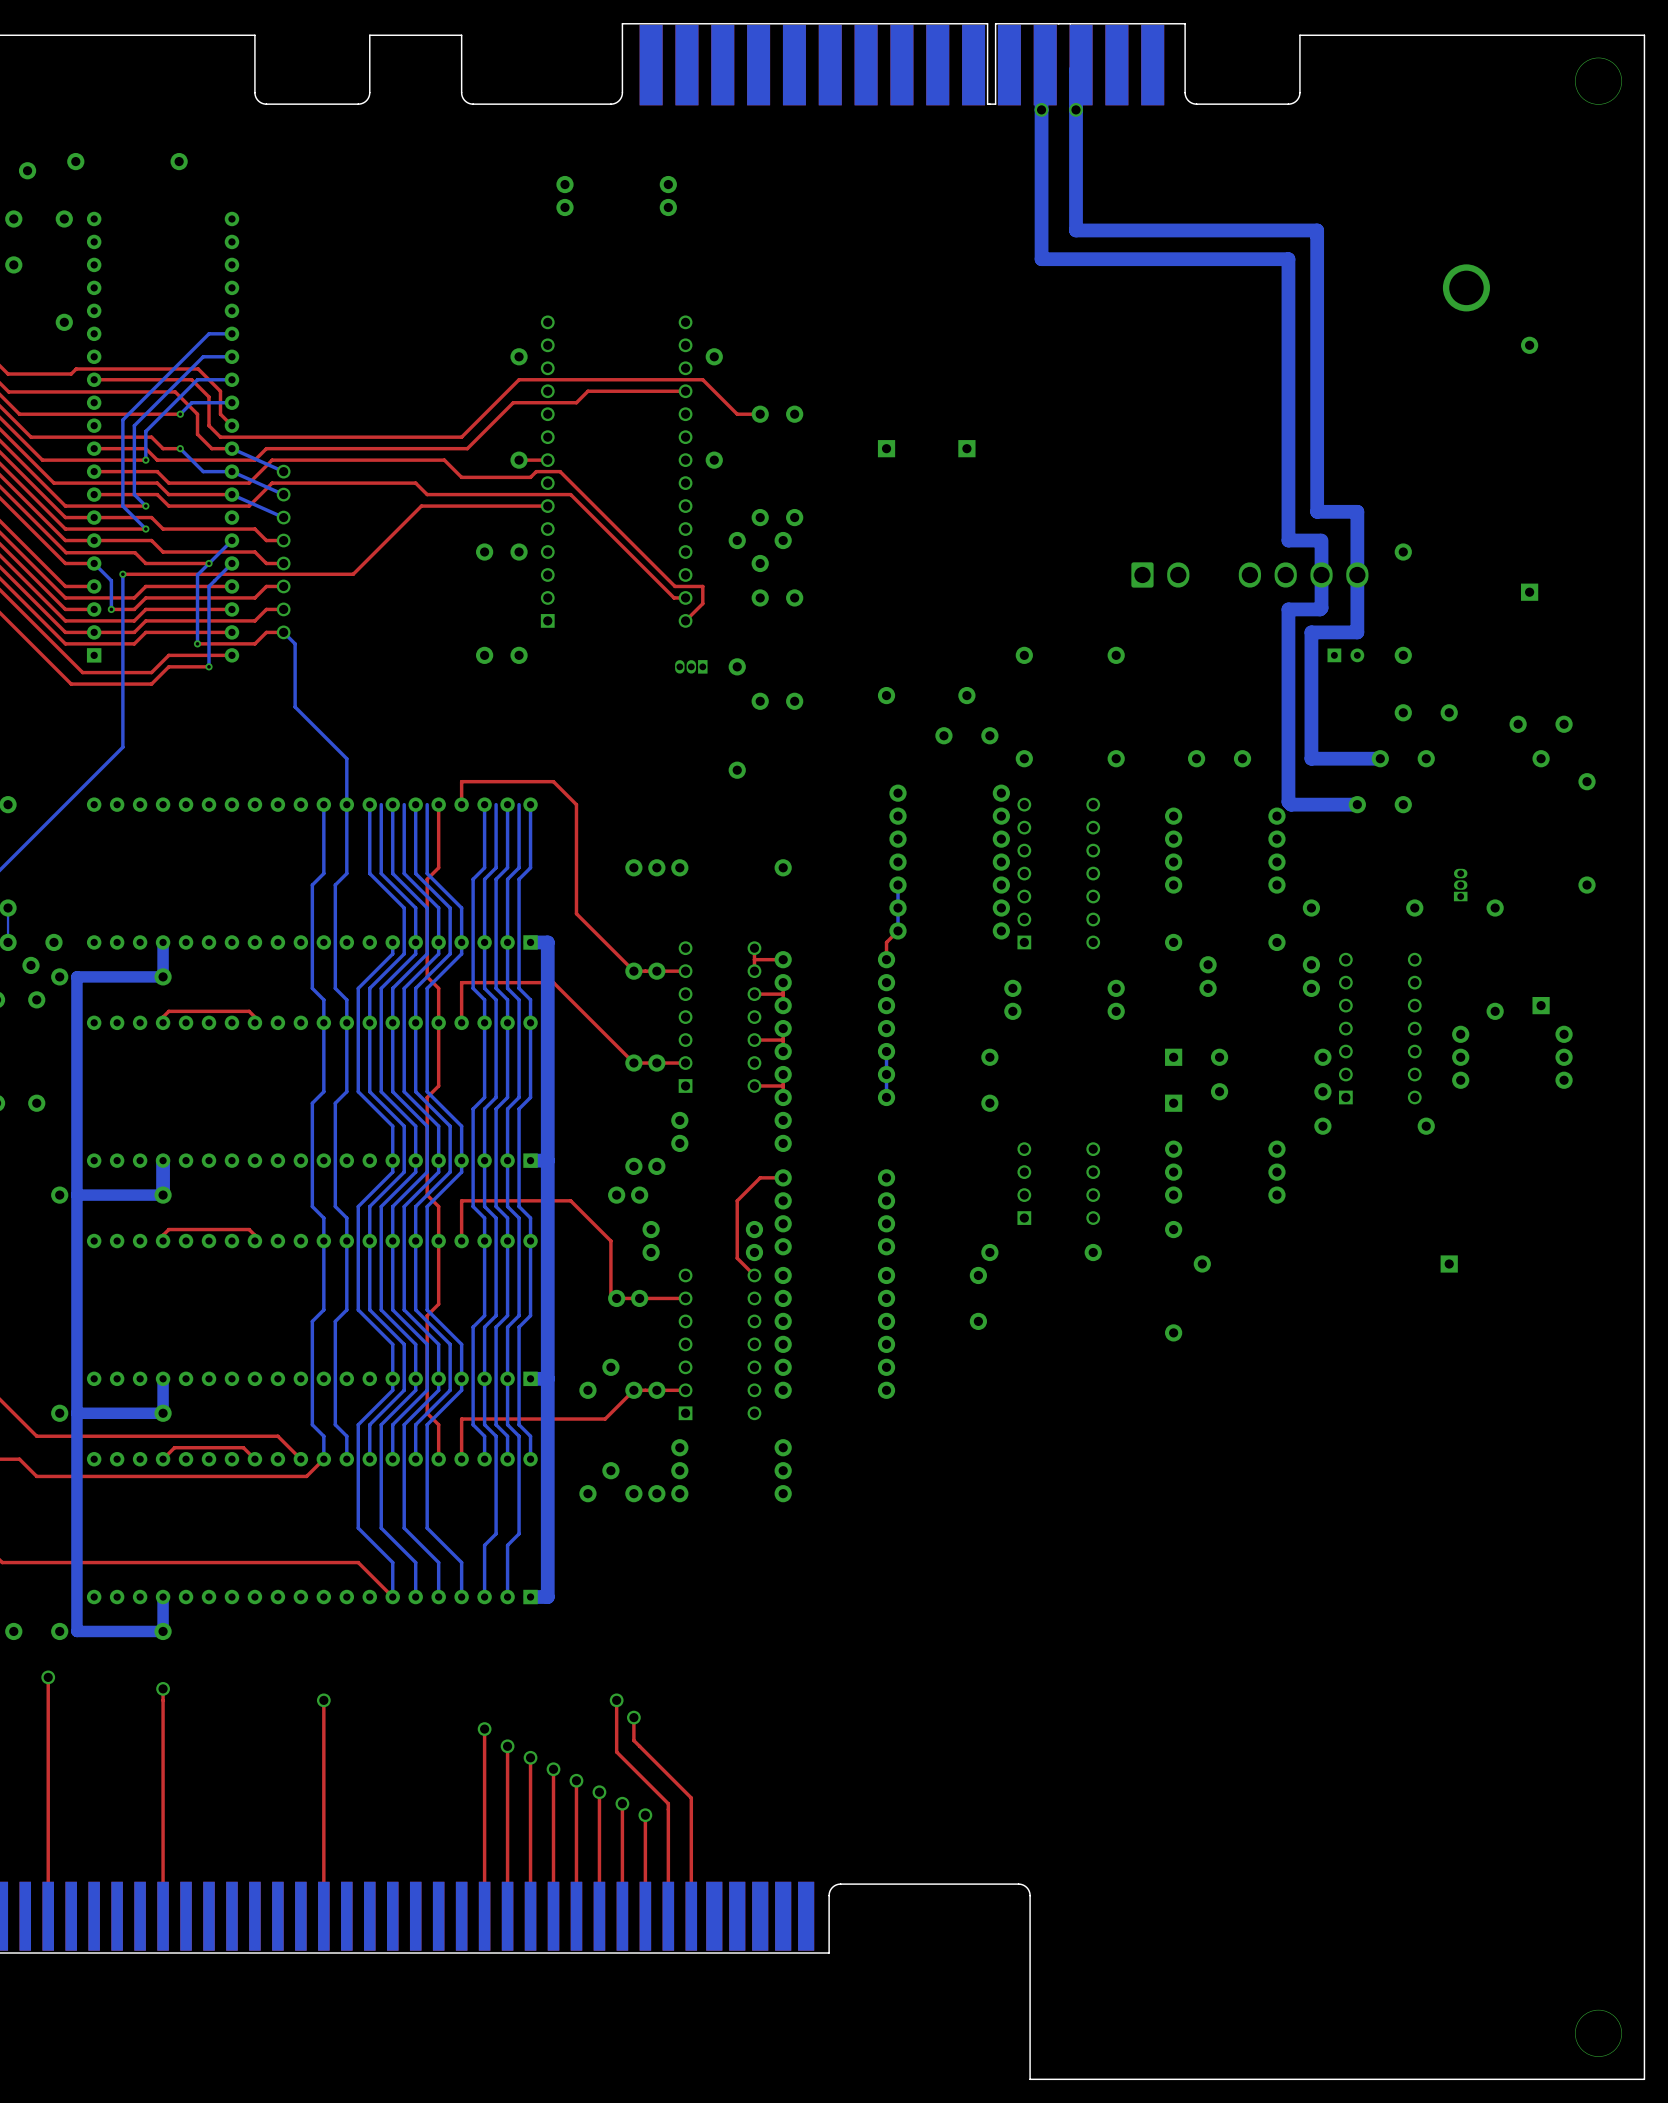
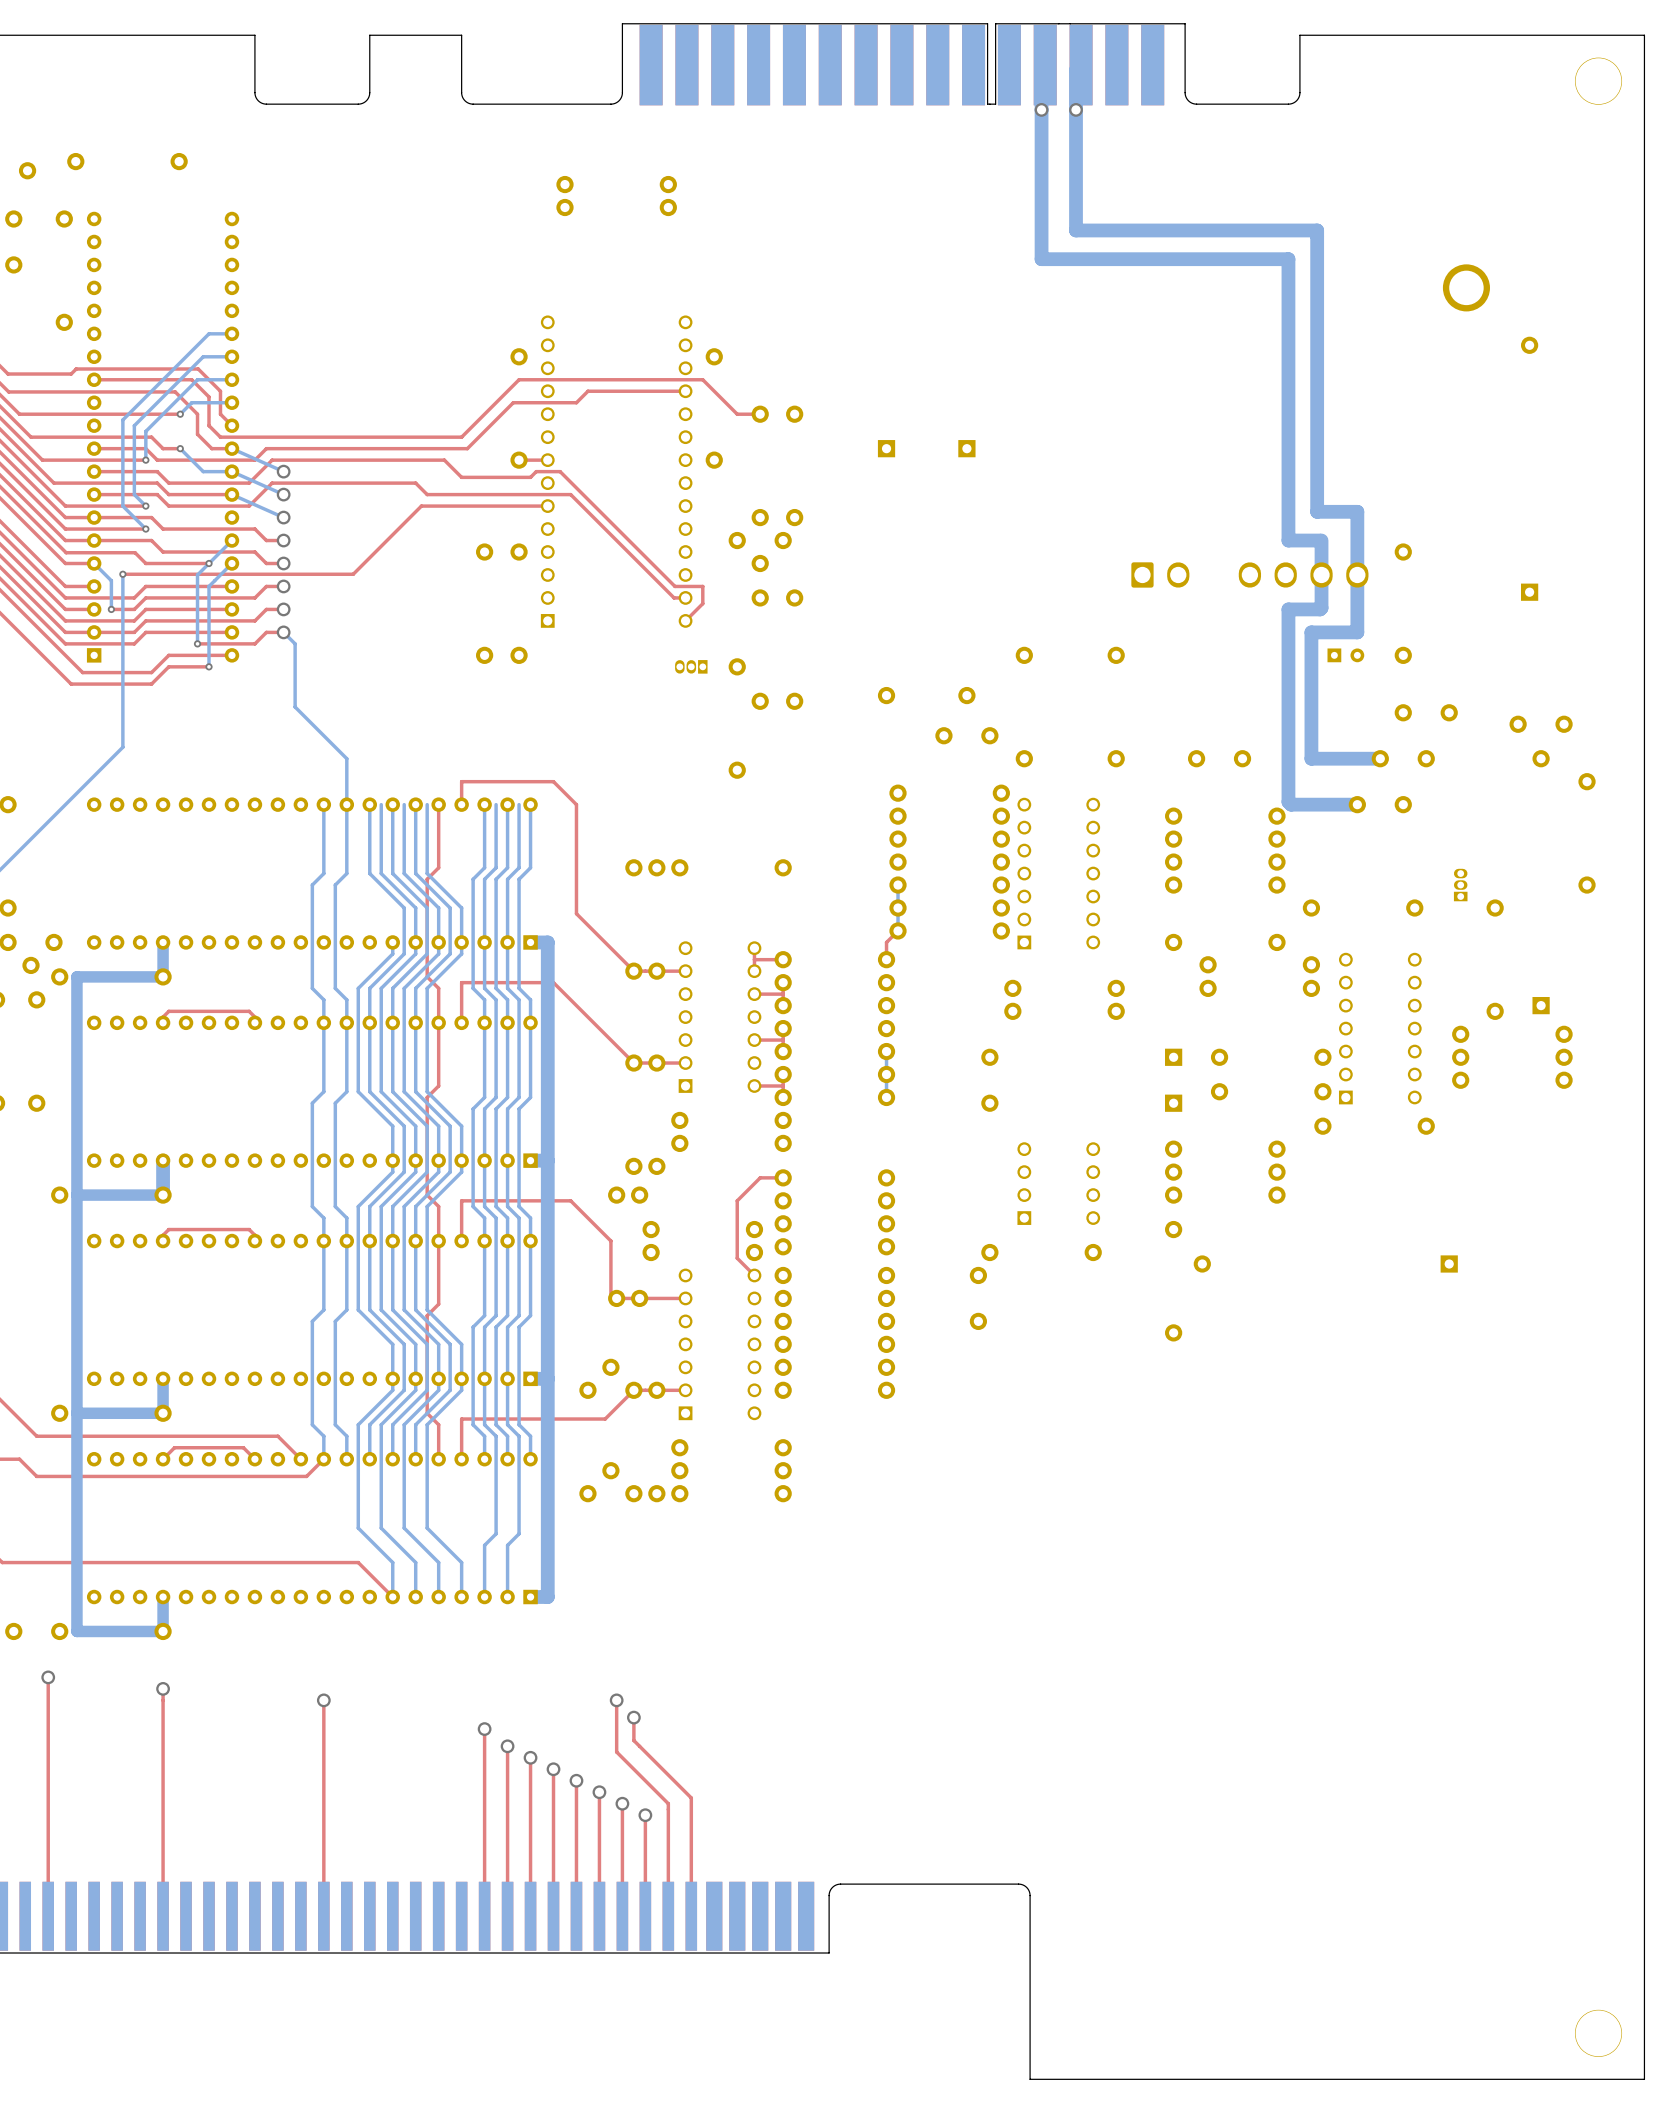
bottom track: (8, 908) (8, 942) -> none

